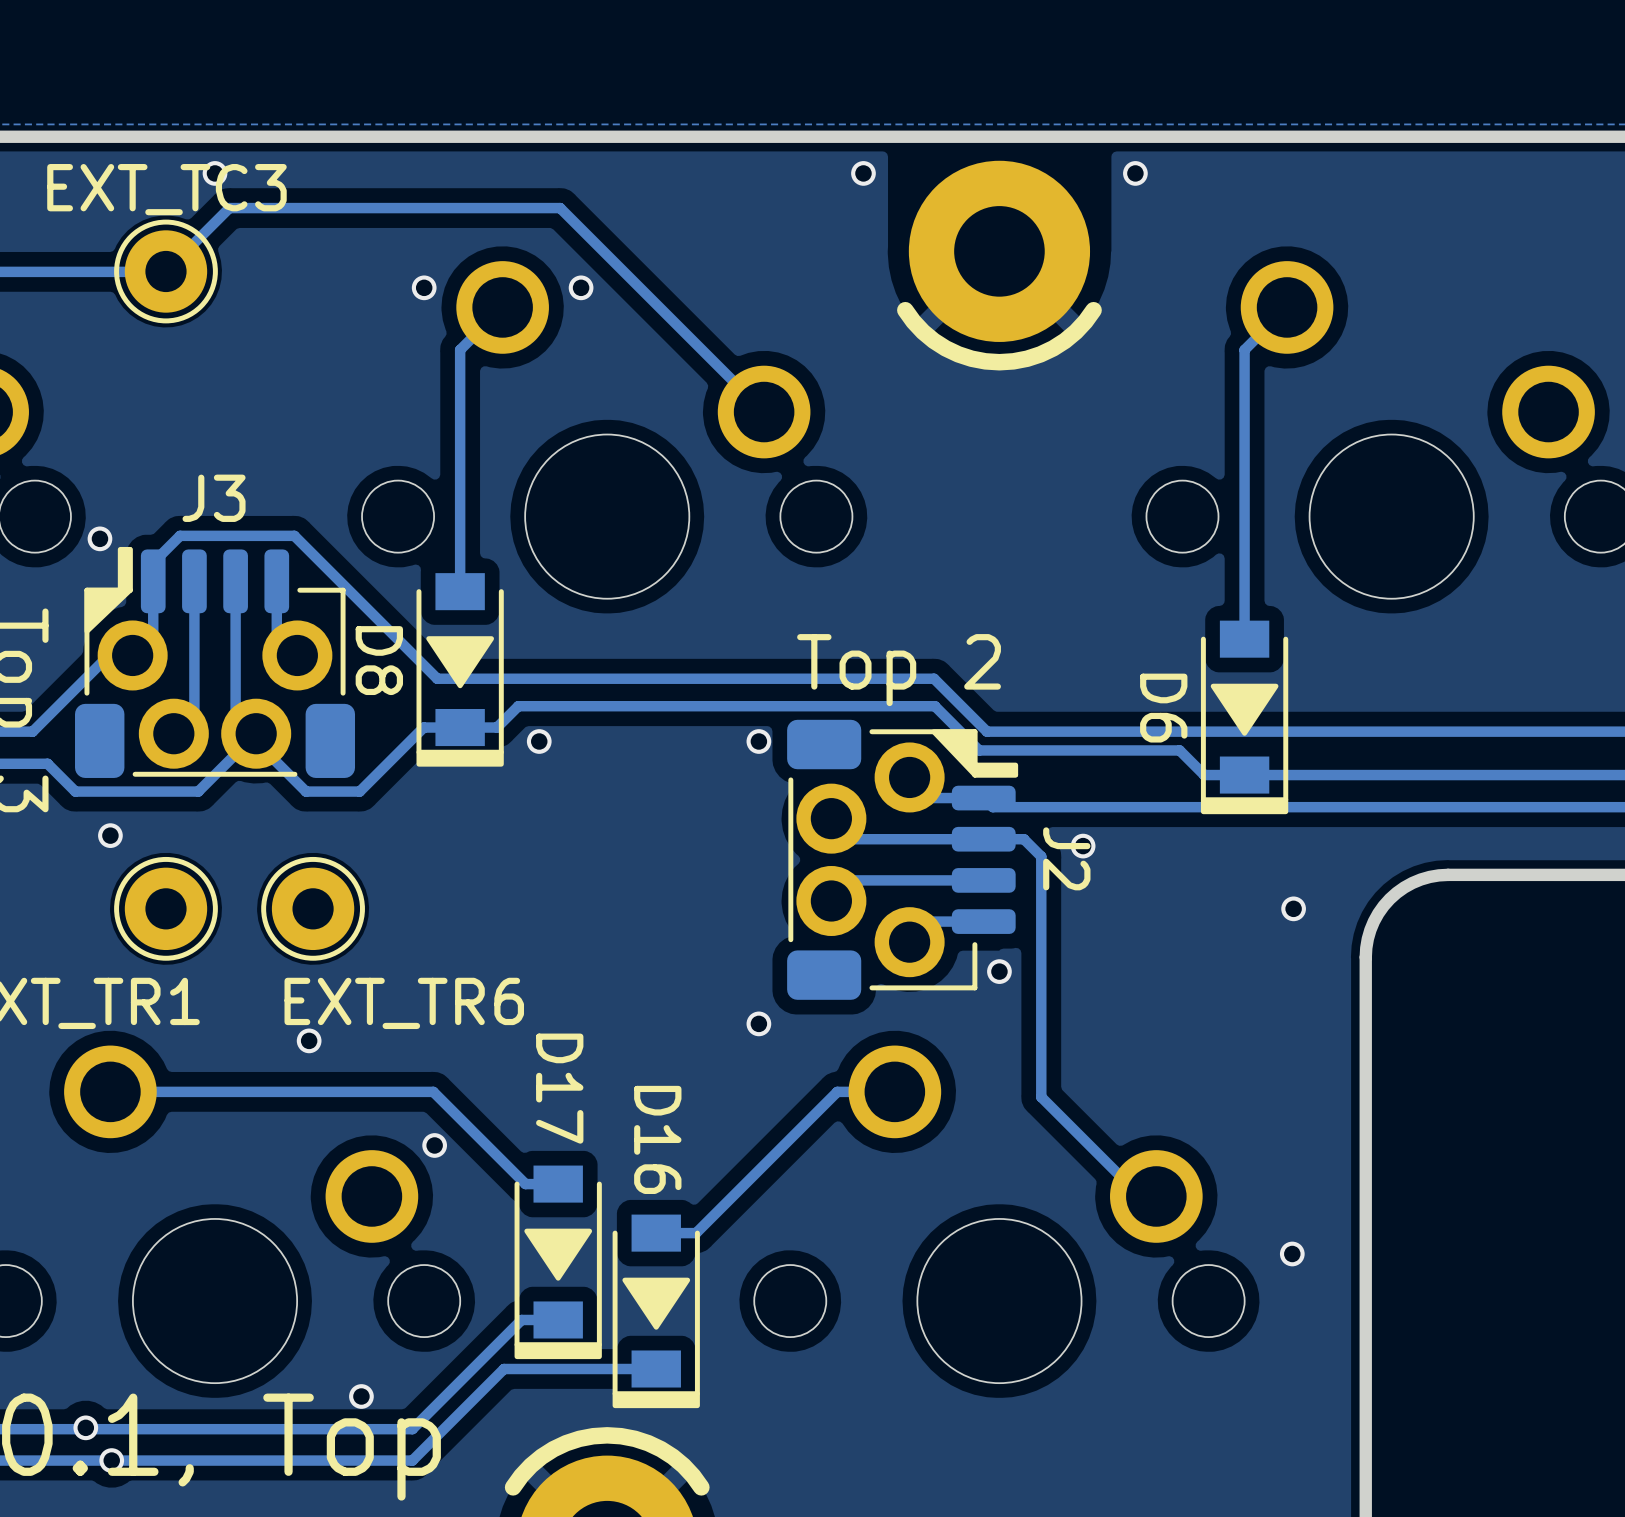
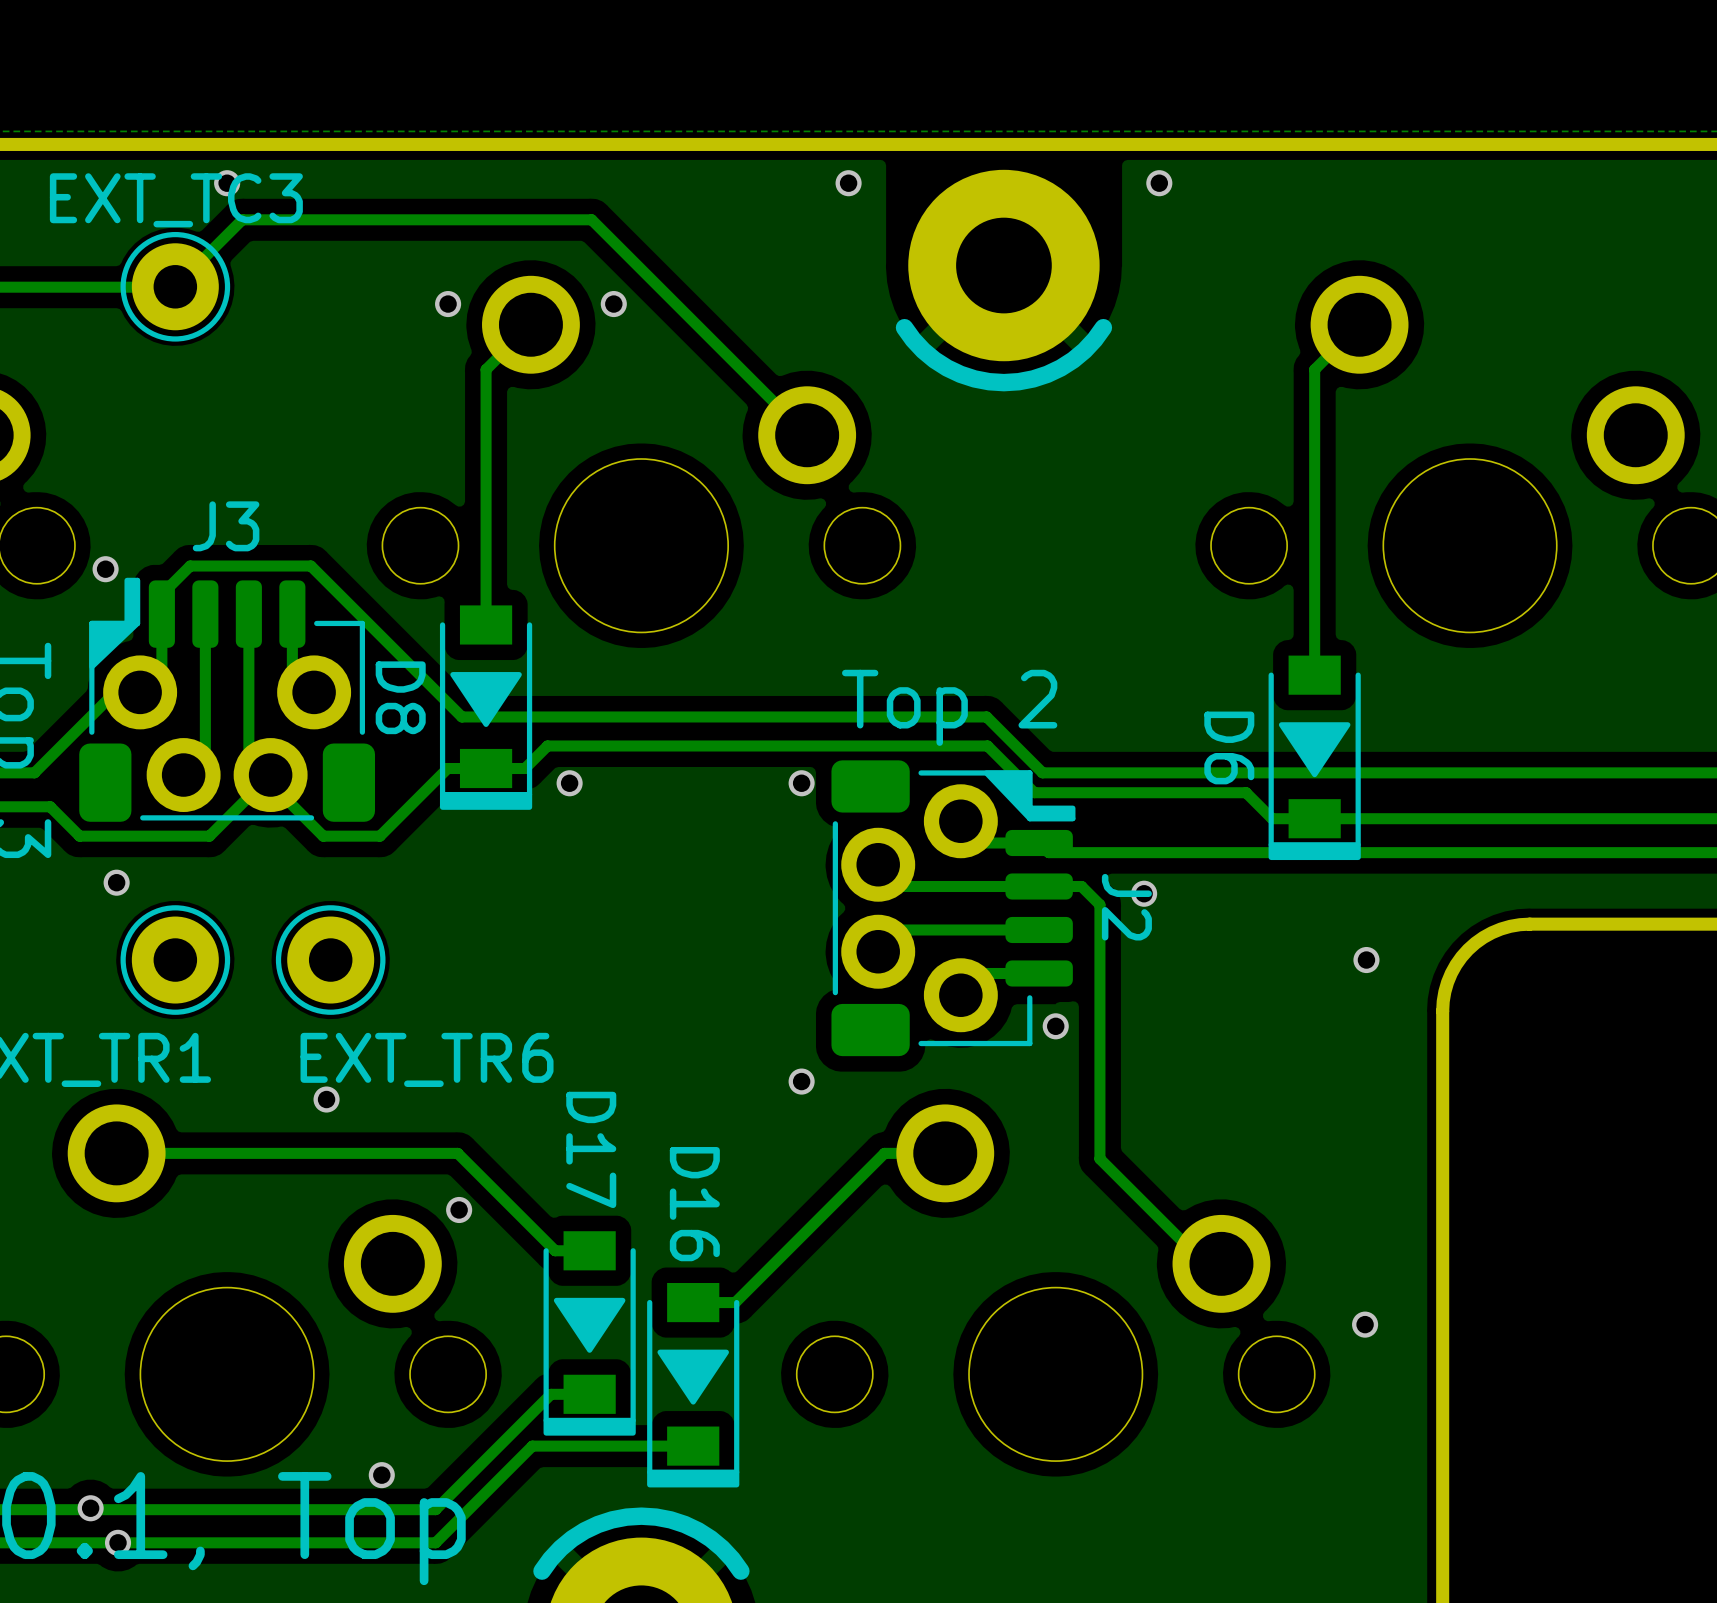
via position: (863, 173) -> (848, 183)
via position: (1135, 173) -> (1159, 183)
part position: (999, 265) -> (1003, 280)

